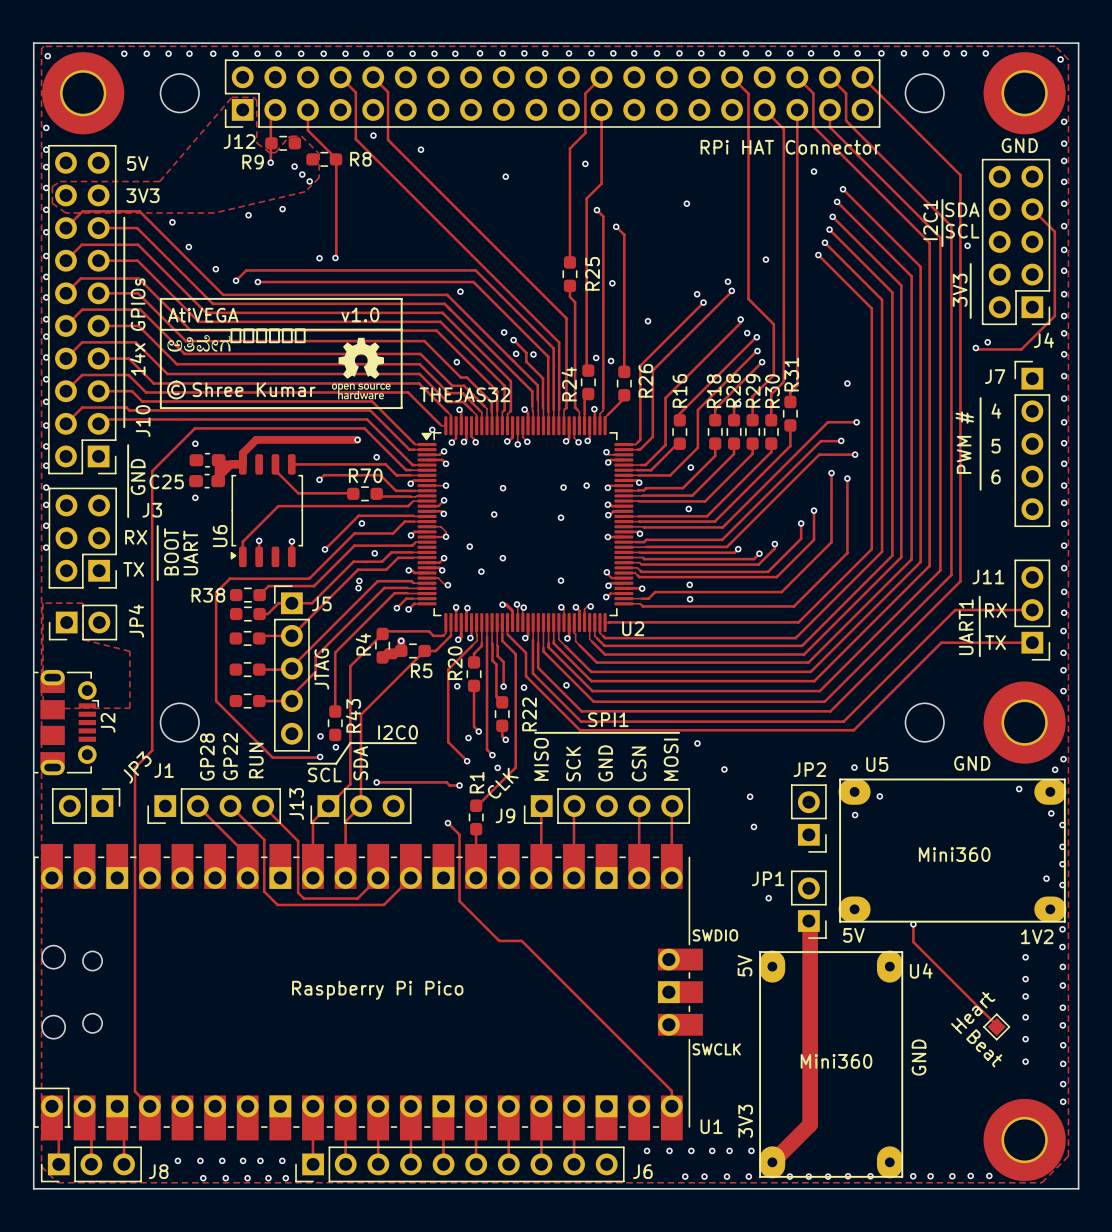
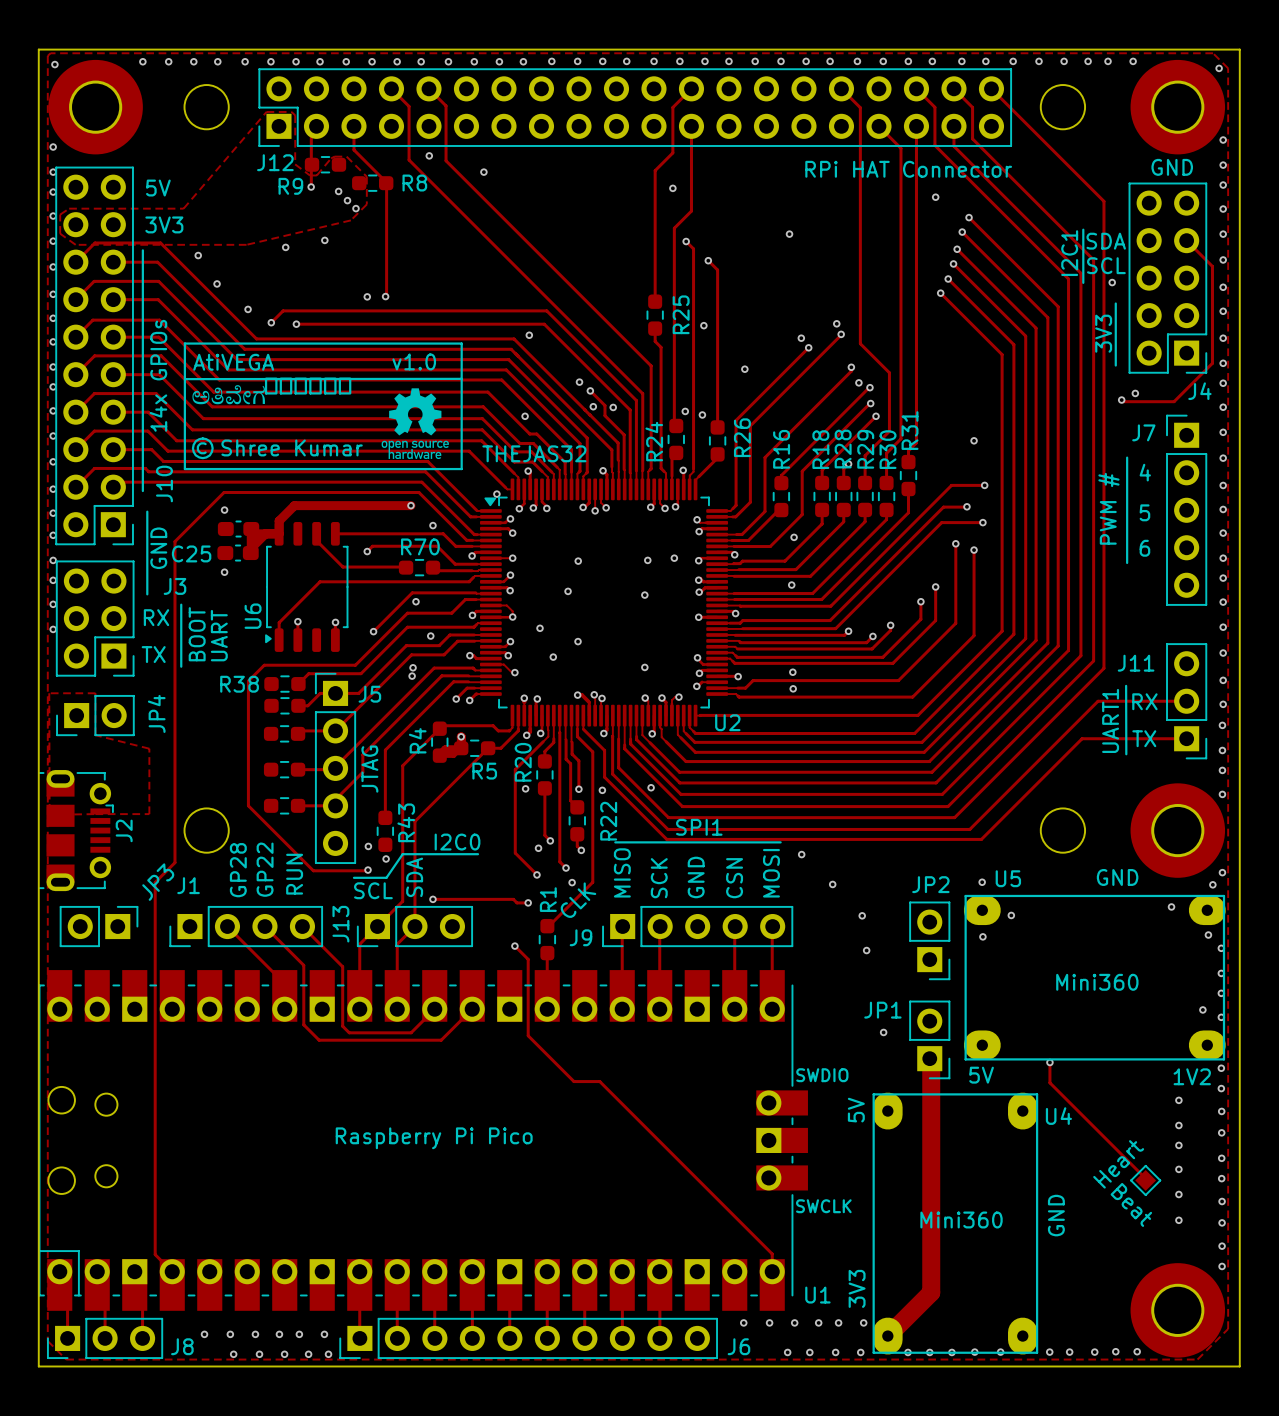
via: (505, 176) -> none
via: (765, 259) -> none

